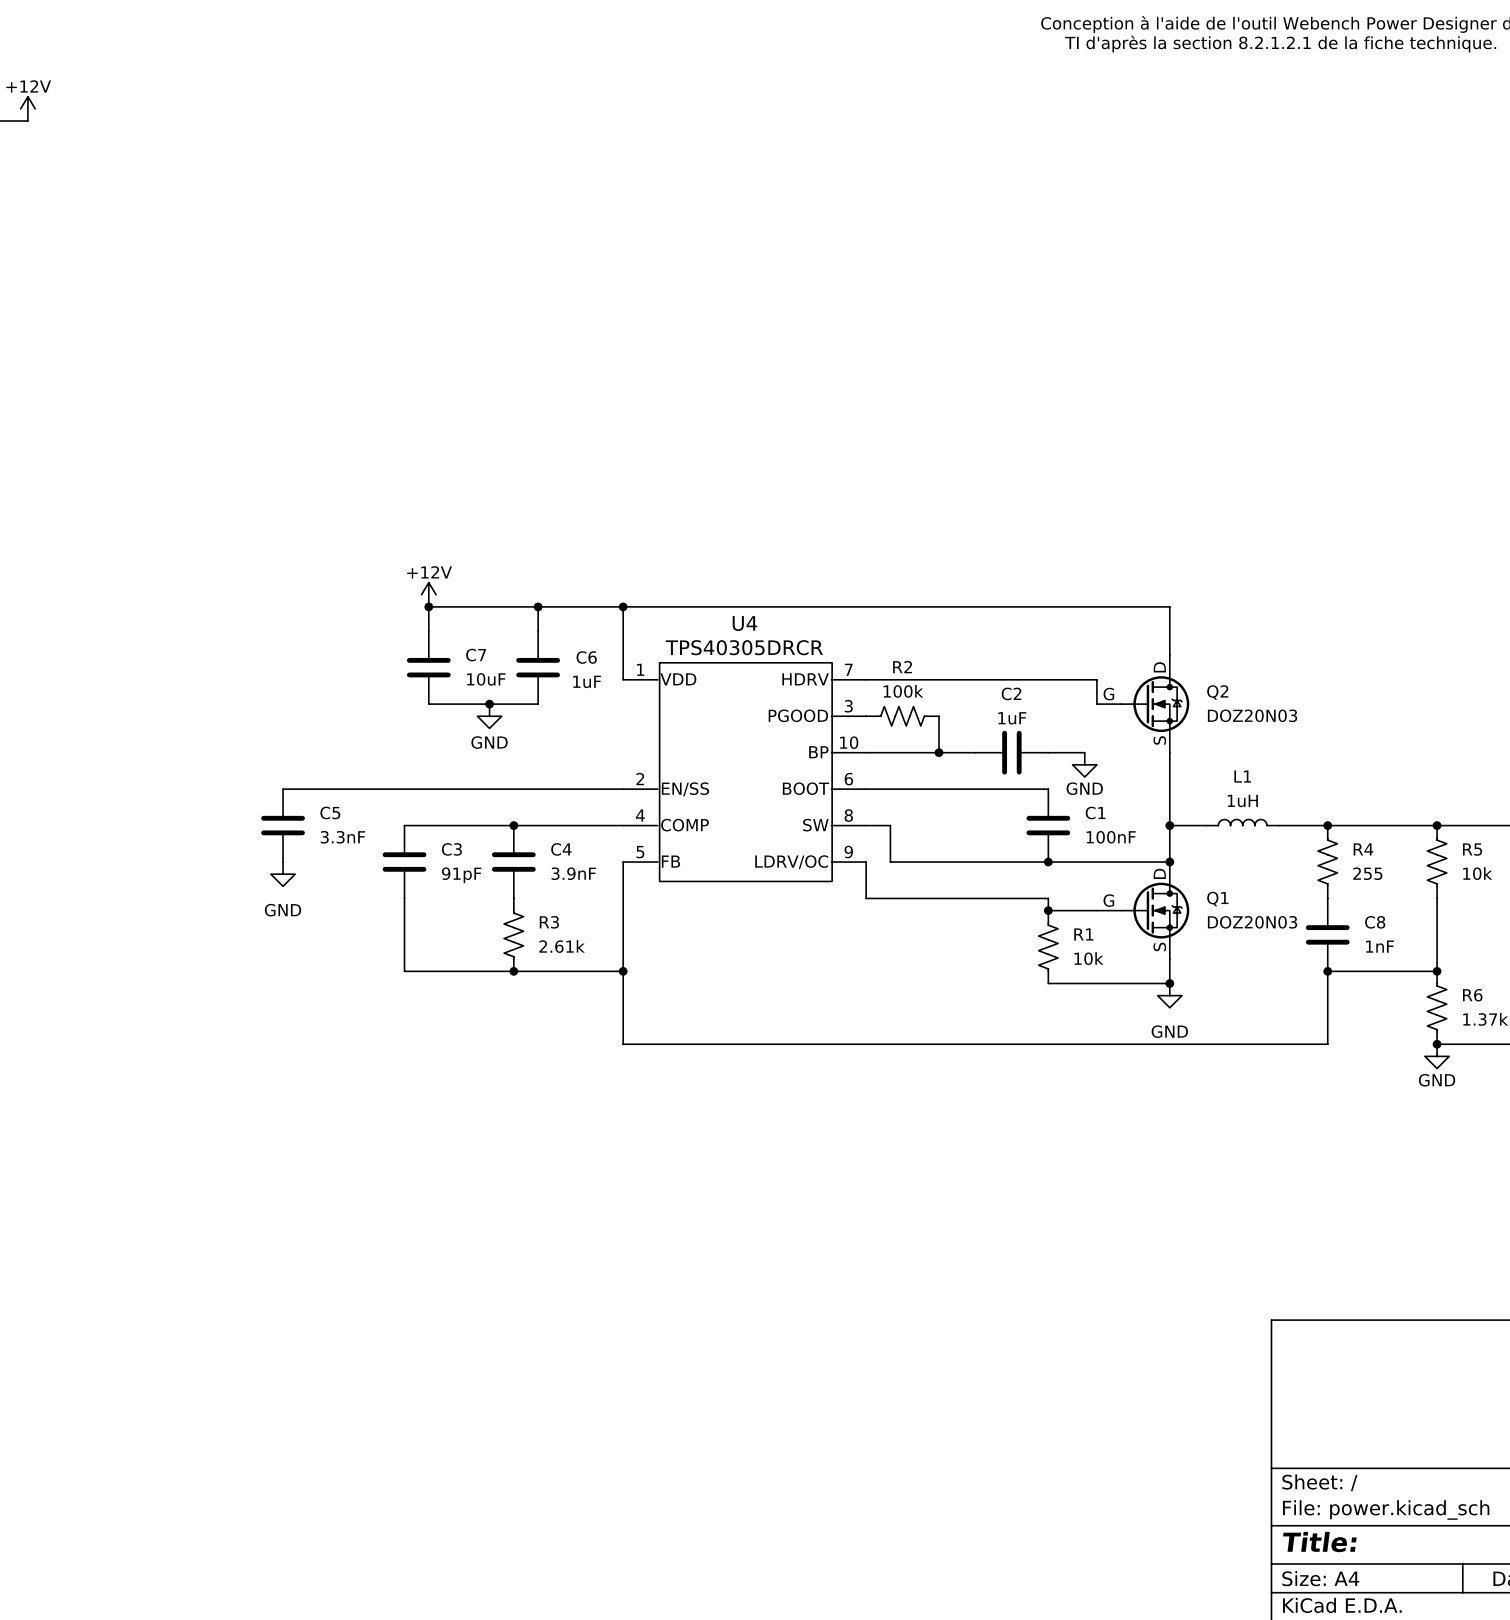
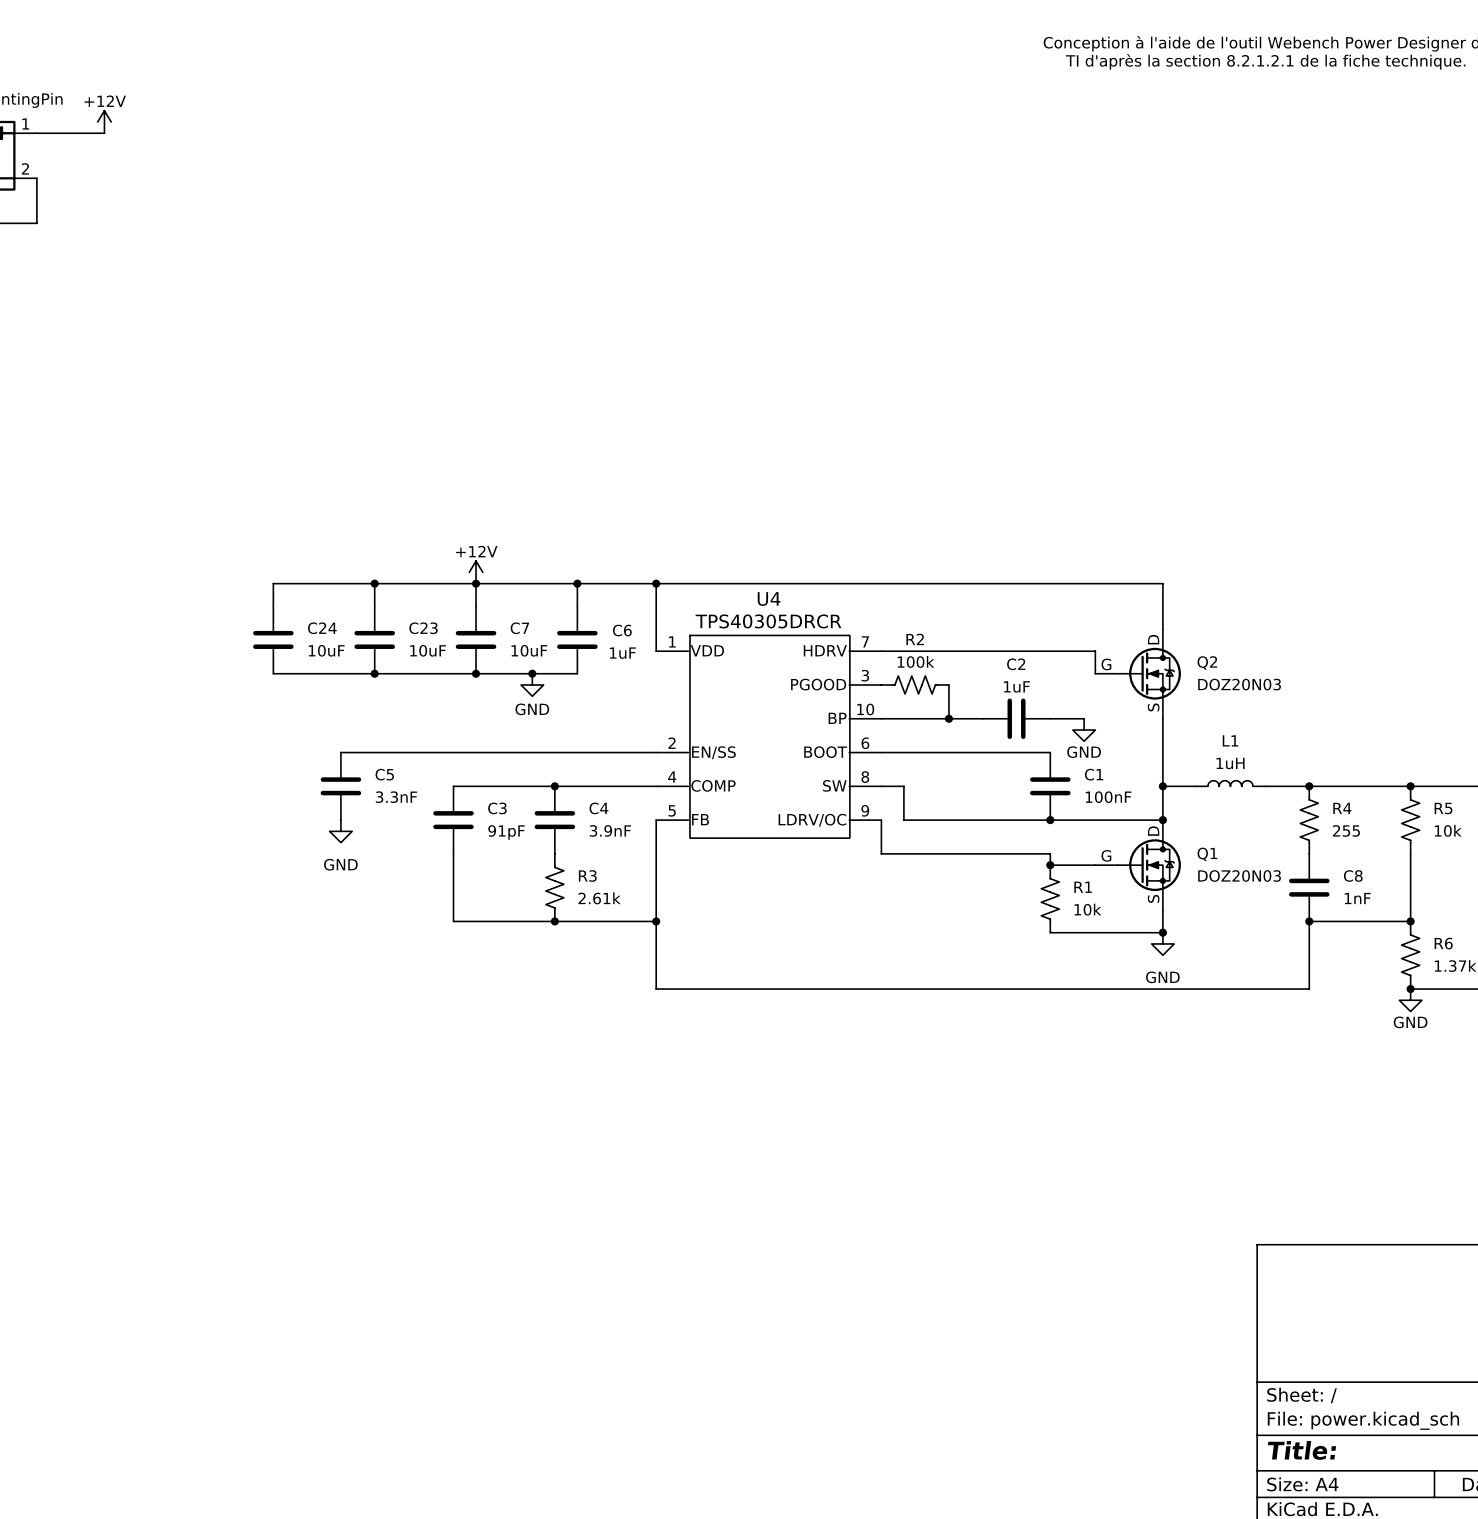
wire: none -> (374, 583) (374, 606)
junction: none -> (374, 583)
wire: none -> (476, 583) (273, 583) (273, 606)
C24: none -> 10uF (273, 639)
C23: none -> 10uF (374, 639)
wire: none -> (273, 673) (476, 673)
junction: none -> (374, 673)
junction: none -> (476, 673)

